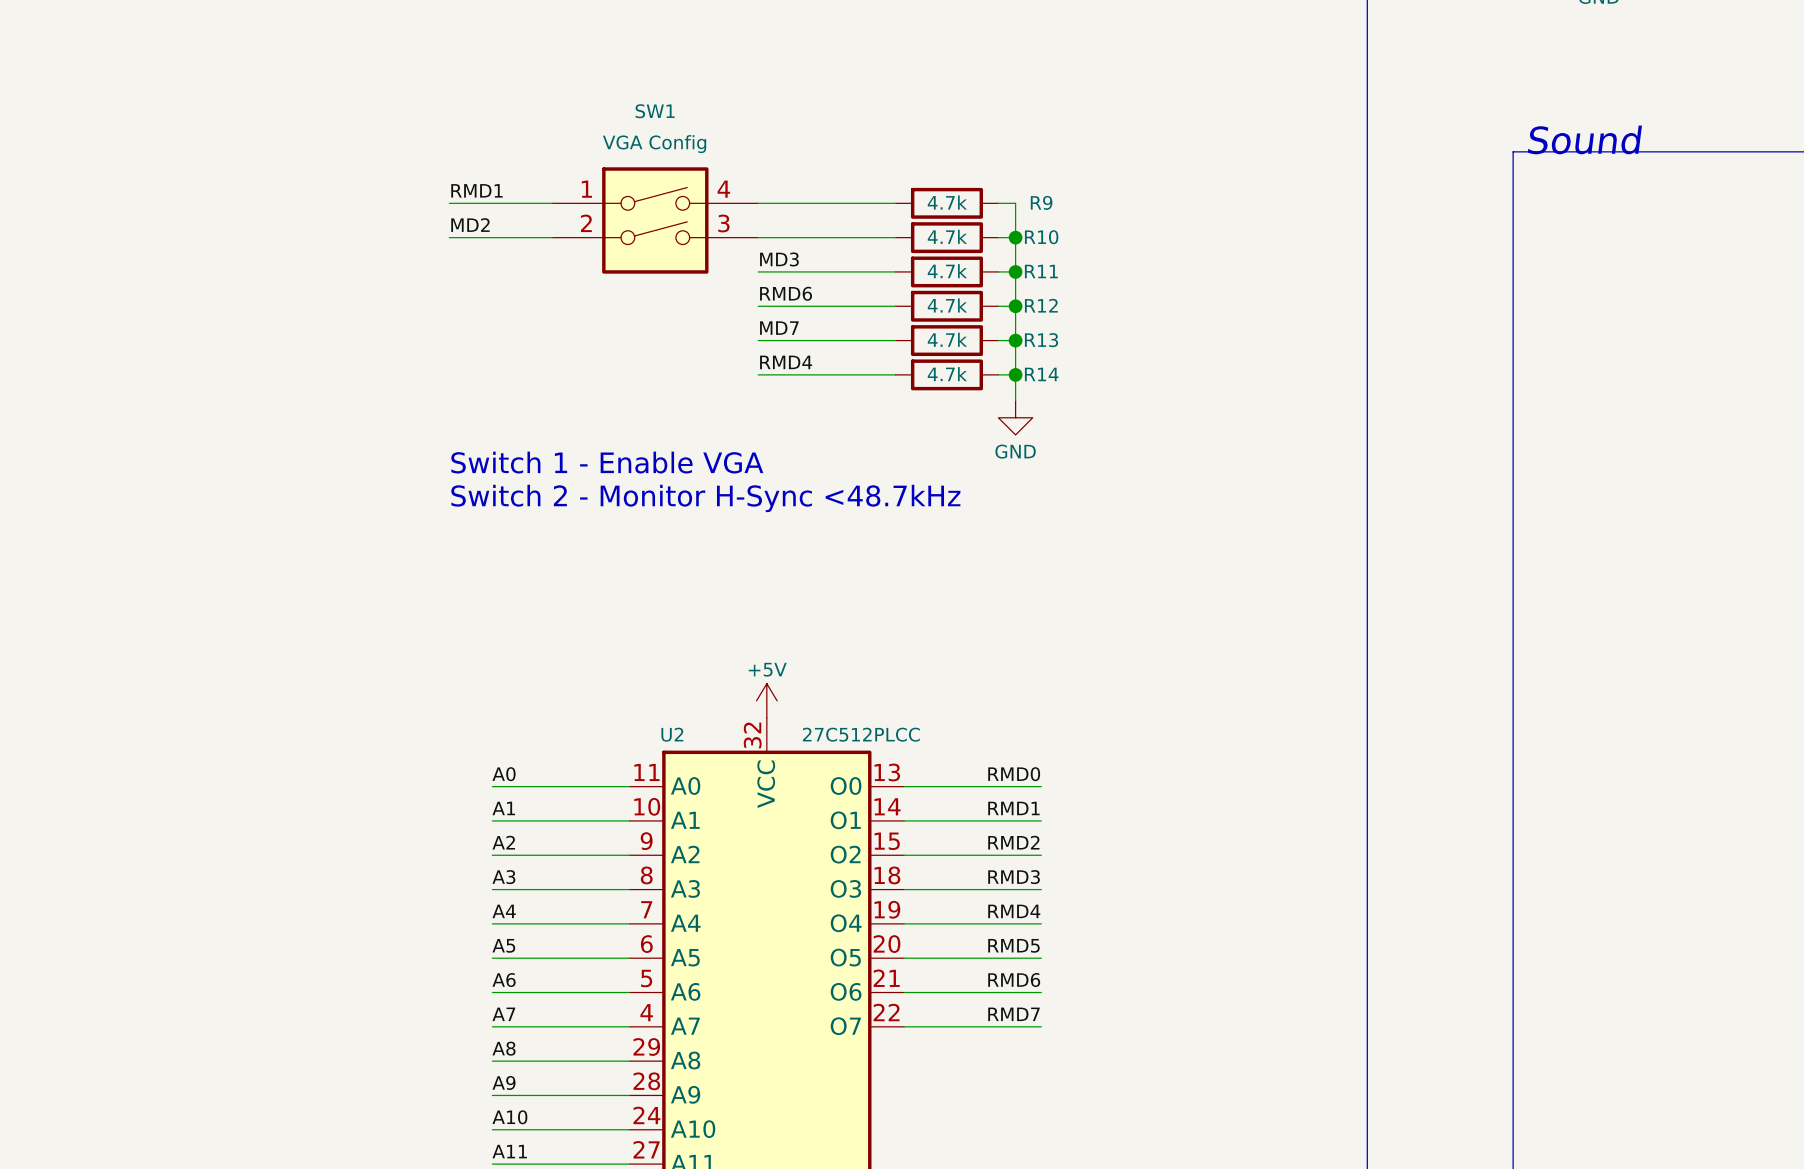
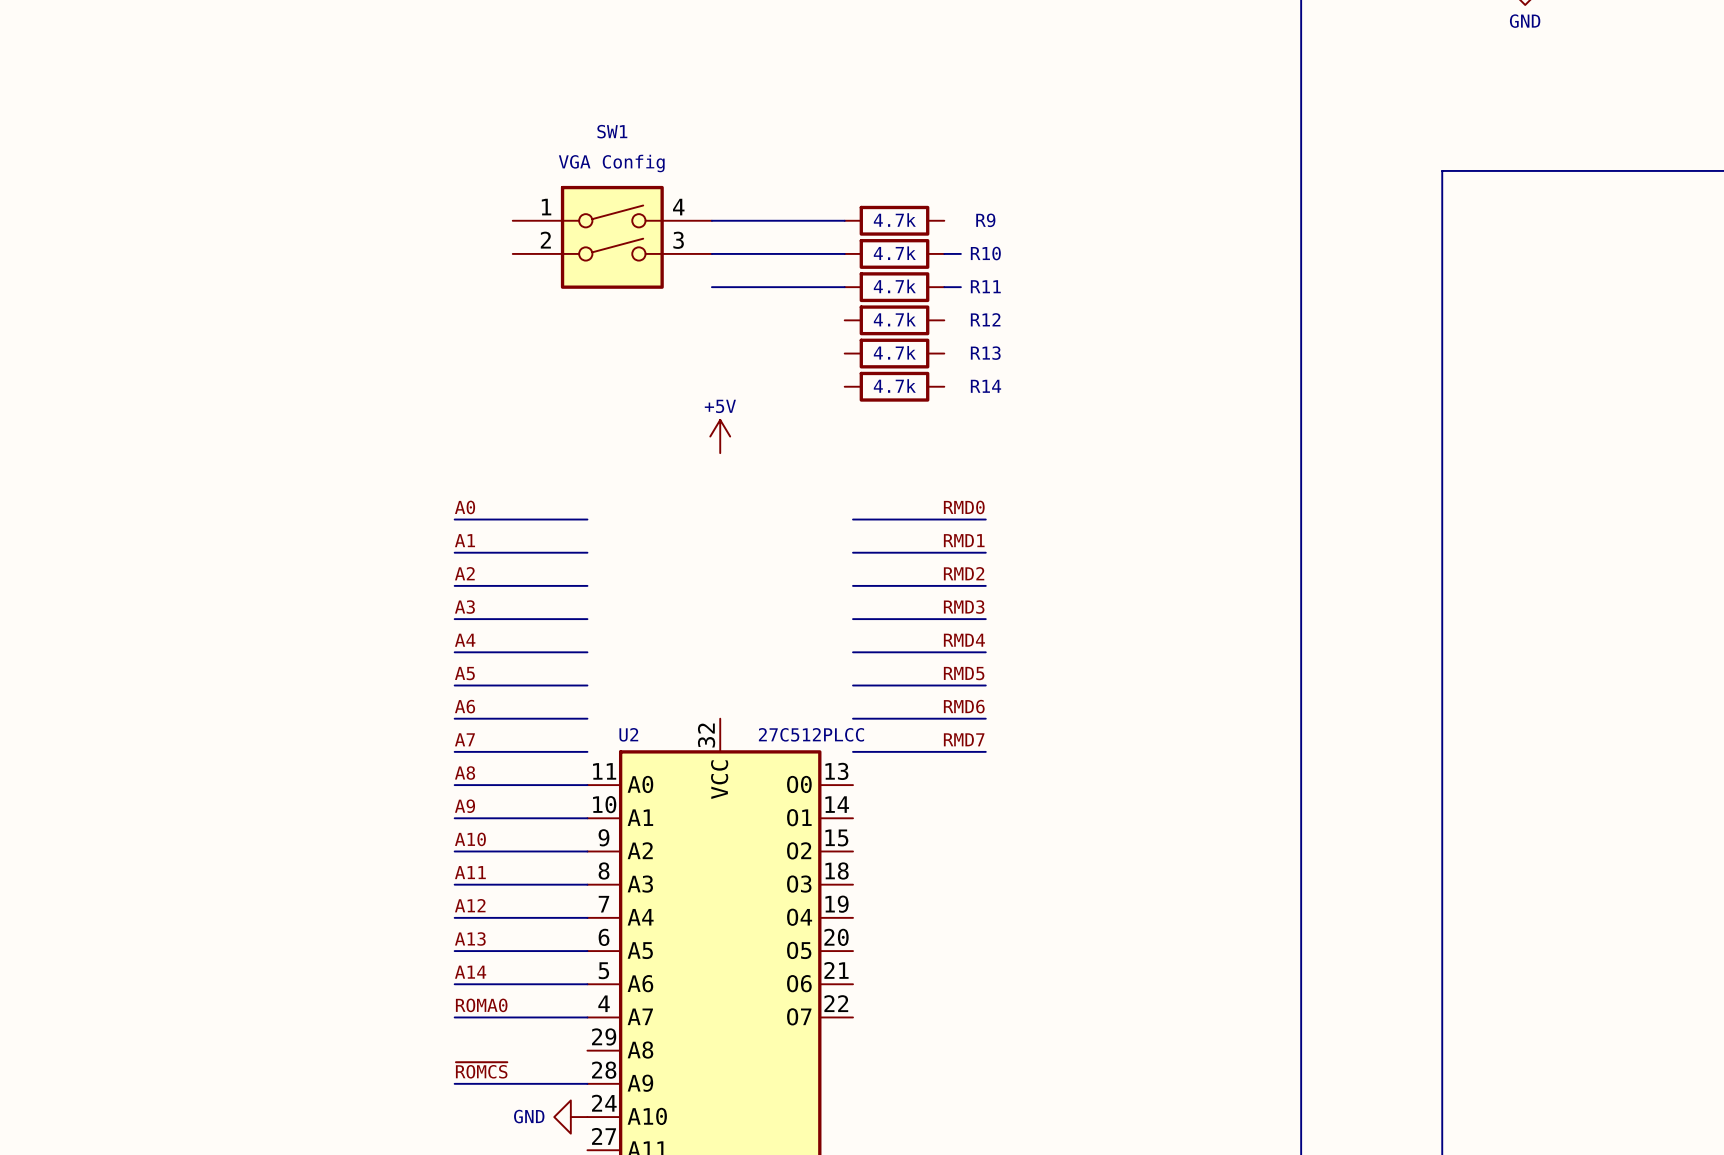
text: Sound (1584, 139) -> none
label: RMD1 (476, 190) -> none
wire: (449, 203) (552, 203) -> none
wire: (998, 203) (1015, 203) (1015, 400) -> none
label: MD2 (470, 225) -> none
wire: (449, 237) (552, 237) -> none
junction: (1015, 237) -> none
label: MD3 (779, 259) -> none
junction: (1015, 271) -> none
label: RMD6 (786, 293) -> none
wire: (758, 306) (895, 306) -> (454, 519) (587, 519)
wire: (998, 306) (1015, 306) -> none
junction: (1015, 306) -> none
label: MD7 (779, 328) -> none
wire: (758, 340) (895, 340) -> (454, 552) (587, 552)
wire: (998, 340) (1015, 340) -> none
junction: (1015, 340) -> none
label: RMD4 (786, 362) -> none
wire: (758, 374) (895, 374) -> (454, 585) (587, 585)
wire: (998, 374) (1015, 374) -> none
junction: (1015, 374) -> none
power symbol: GND (1015, 417) -> none
text: Switch 1 - Enable VGA (607, 462) -> none
text: Switch 2 - Monitor H-Sync <48.7kHz (705, 498) -> none
label: none -> A0 (465, 507)
label: none -> A1 (465, 540)
label: none -> A2 (464, 573)
label: none -> A3 (464, 607)
wire: none -> (454, 619) (587, 619)
label: none -> A4 (465, 640)
label: none -> RMD4 (964, 640)
wire: none -> (454, 652) (587, 652)
label: none -> A5 (464, 673)
wire: none -> (454, 685) (587, 685)
power symbol position: +5V (766, 700) -> +5V (720, 436)
label: none -> A6 (465, 706)
label: none -> RMD6 (964, 706)
wire: none -> (454, 718) (587, 718)
label: none -> A7 (464, 739)
label: A0 (504, 774) -> A8 (465, 773)
label position: RMD0 (1014, 774) -> RMD0 (964, 507)
wire: (904, 786) (1041, 786) -> (853, 519) (985, 519)
label: A1 (503, 808) -> A9 (465, 806)
label position: RMD1 (1013, 808) -> RMD1 (964, 540)
wire: (904, 820) (1041, 820) -> (853, 552) (985, 552)
label: A2 (503, 842) -> A10 (470, 839)
label position: RMD2 (1013, 842) -> RMD2 (964, 573)
wire: (904, 855) (1041, 855) -> (853, 585) (985, 585)
label: A3 (503, 877) -> A11 (470, 872)
label position: RMD3 (1014, 877) -> RMD3 (964, 607)
wire: (904, 889) (1041, 889) -> (853, 619) (985, 619)
label: A4 (504, 911) -> A12 (470, 905)
label: RMD4 (1014, 911) -> none
wire: (904, 923) (1041, 923) -> (853, 652) (985, 652)
label: A5 (503, 945) -> A13 (470, 938)
label position: RMD5 (1013, 945) -> RMD5 (964, 673)
wire: (904, 958) (1041, 958) -> (853, 685) (985, 685)
label: A6 (504, 980) -> A14 (470, 972)
label: RMD6 (1014, 980) -> none
wire: (904, 992) (1041, 992) -> (853, 718) (985, 718)
label: A7 (503, 1014) -> ROMA0 (481, 1005)
label position: RMD7 (1013, 1014) -> RMD7 (964, 739)
wire: (904, 1026) (1041, 1026) -> (853, 751) (985, 751)
label: A8 (504, 1048) -> none
wire: (492, 1061) (629, 1061) -> (454, 751) (587, 751)
label: A9 (503, 1082) -> ~{ROMCS} (481, 1070)
label: A10 (509, 1117) -> none
wire: (492, 1129) (629, 1129) -> none
power symbol: none -> GND (570, 1117)
label: A11 (509, 1151) -> none
wire: (492, 1164) (629, 1164) -> none

